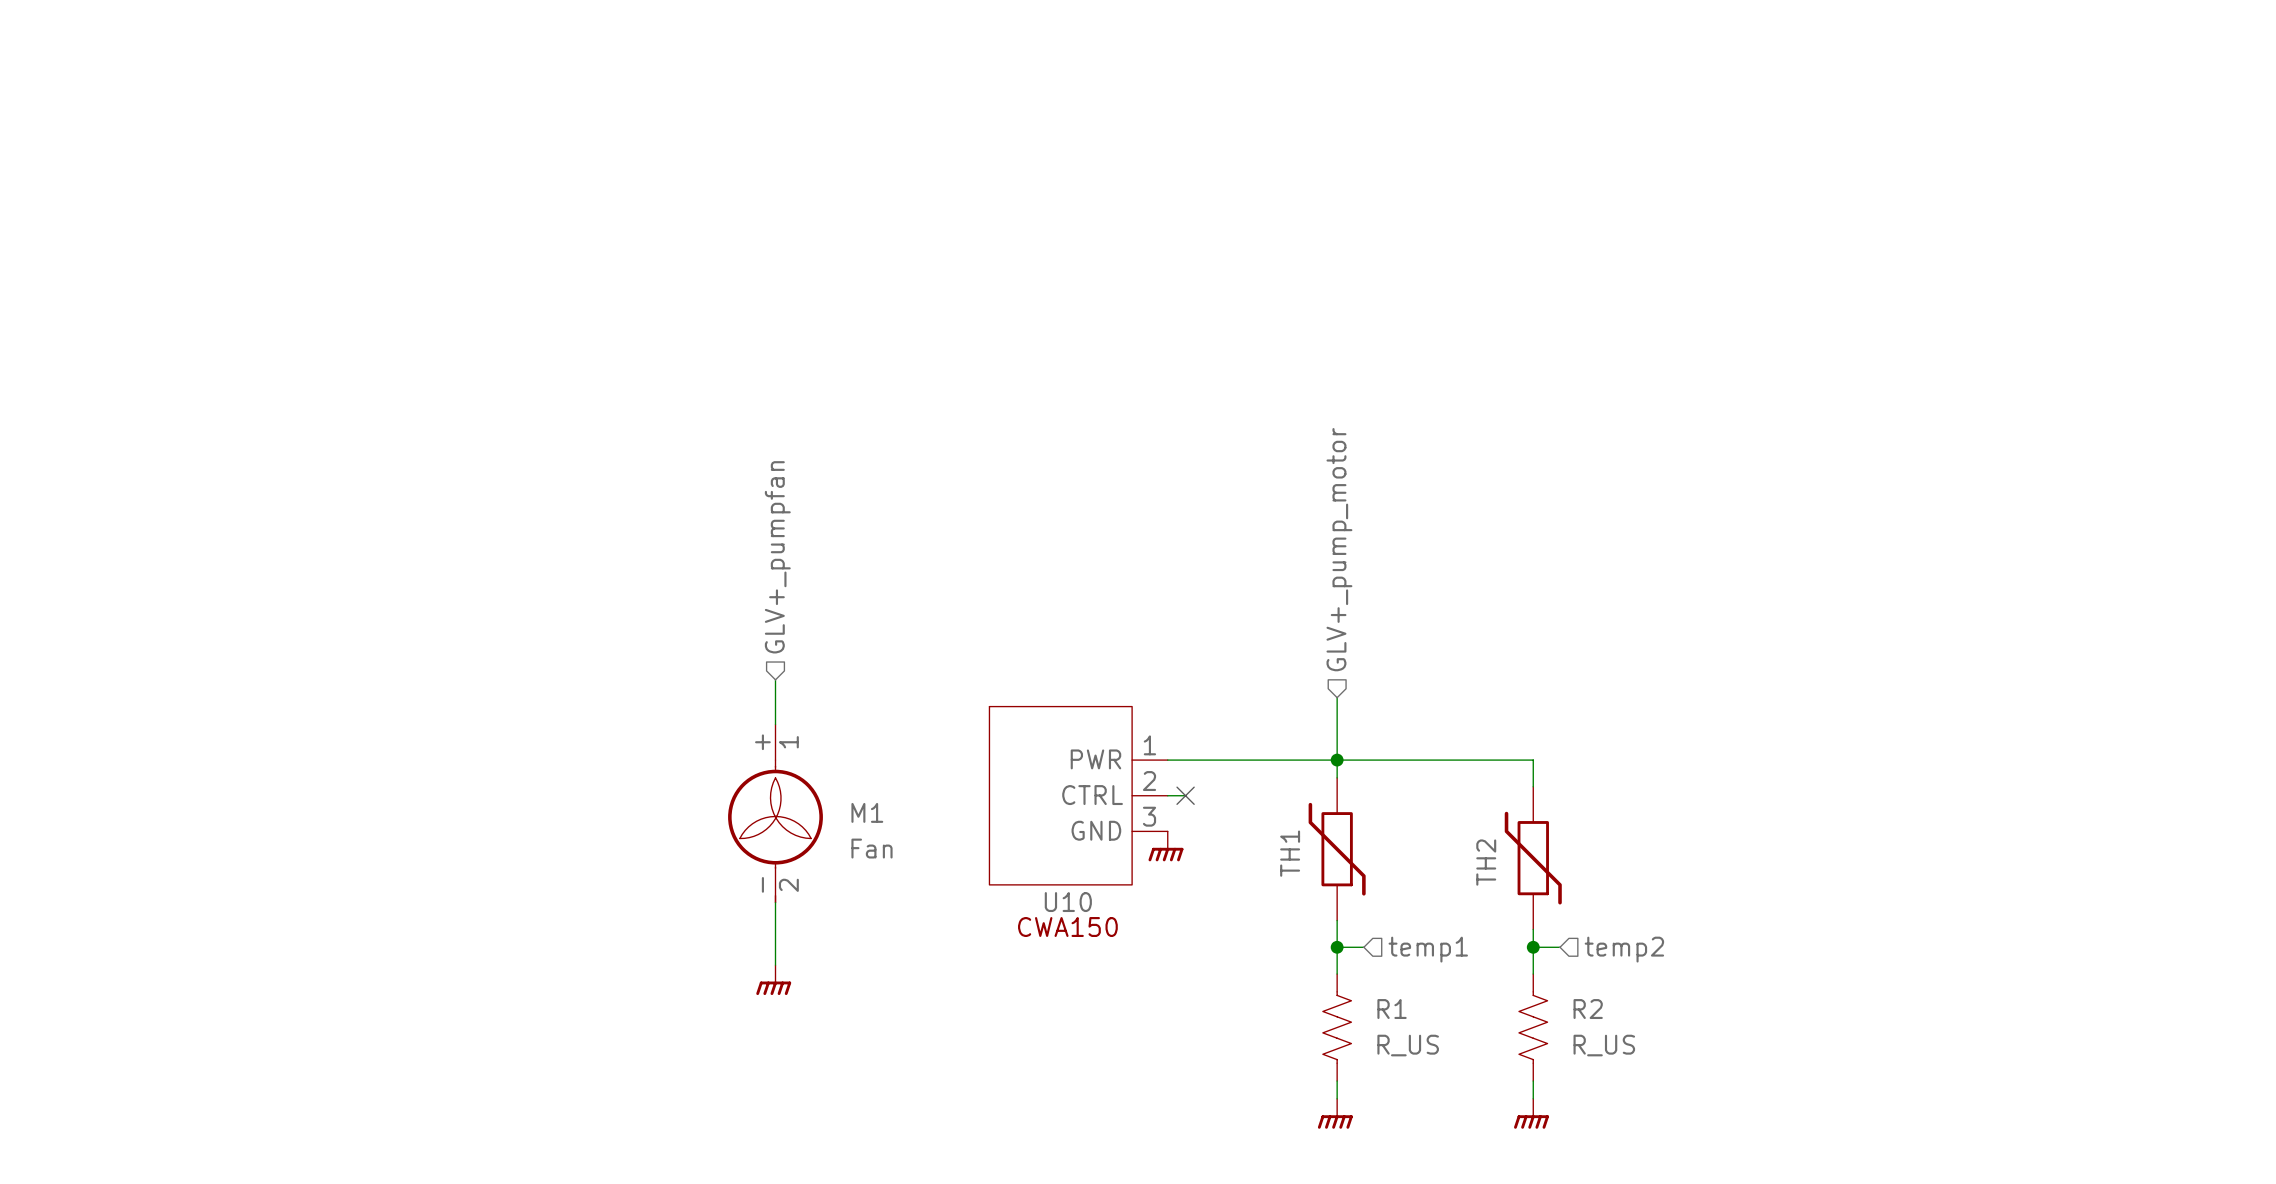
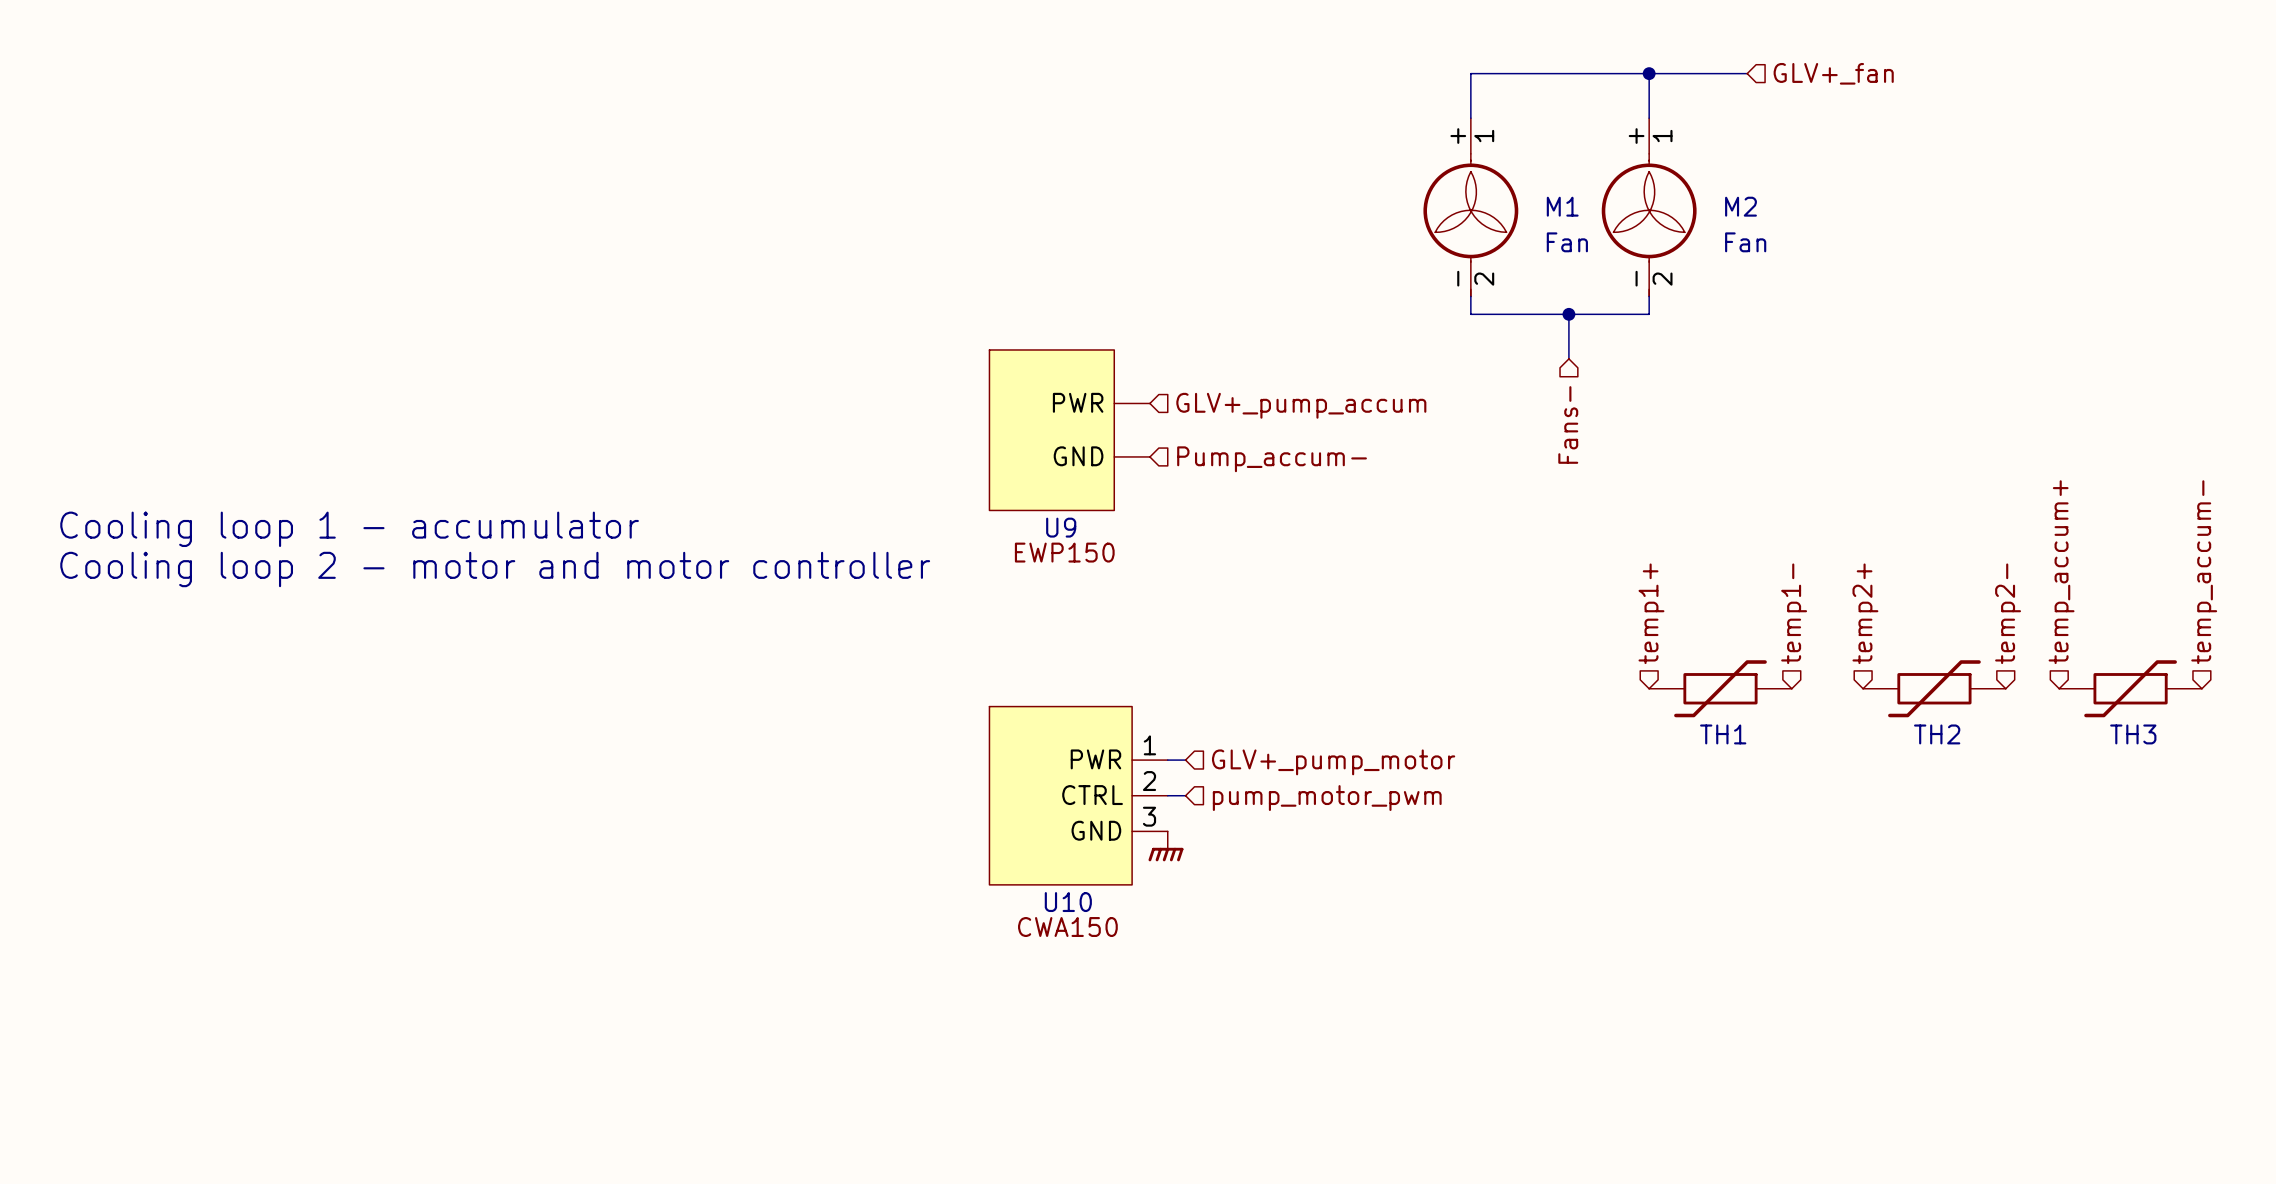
wire: none -> (1649, 73) (1649, 118)
junction: none -> (1649, 73)
wire: none -> (1747, 73) (1470, 73) (1470, 118)
hierarchical label: none -> GLV+_fan (1833, 73)
M2: none -> Fan (1649, 207)
wire: none -> (1470, 296) (1470, 314) (1649, 314) (1649, 296)
wire: none -> (1568, 314) (1568, 358)
junction: none -> (1568, 314)
hierarchical label: none -> GLV+_pump_accum (1301, 405)
hierarchical label: none -> Fans- (1568, 424)
U9: none -> (1069, 430)
hierarchical label: none -> Pump_accum- (1272, 459)
text: none -> Cooling loop 1 - accumulator (349, 529)
hierarchical label rotation: 0° (1339, 549) -> 90° clockwise (1333, 762)
hierarchical label: GLV+_pumpfan (777, 557) -> none
text: none -> Cooling loop 2 - motor and motor controller (495, 569)
hierarchical label: none -> temp_accum+ (2061, 572)
hierarchical label: none -> temp_accum- (2204, 572)
hierarchical label: none -> temp1+ (1651, 613)
hierarchical label: none -> temp1- (1794, 613)
hierarchical label: none -> temp2+ (1865, 613)
hierarchical label: none -> temp2- (2008, 613)
wire: (775, 679) (775, 724) -> none
TH3: none -> (2130, 688)
wire: (1337, 697) (1337, 777) -> none
wire: (1185, 760) (1533, 760) (1533, 786) -> none
junction: (1337, 760) -> none
no-connect mark: (1185, 795) -> none
hierarchical label: none -> pump_motor_pwm (1327, 798)
M1 position: (775, 813) -> (1470, 207)
TH1 rotation: 0° (1337, 849) -> 90° counterclockwise (1720, 688)
TH1 position: (1337, 849) -> (1720, 688)
TH2 rotation: 0° (1533, 858) -> 90° counterclockwise (1934, 688)
TH2 position: (1533, 858) -> (1934, 688)
wire: (775, 902) (775, 965) -> none
wire: (1337, 920) (1337, 974) -> none
wire: (1533, 929) (1533, 974) -> none
wire: (1337, 947) (1363, 947) -> none
junction: (1337, 947) -> none
wire: (1533, 947) (1560, 947) -> none
junction: (1533, 947) -> none
hierarchical label: temp1 (1428, 949) -> none
hierarchical label: temp2 (1624, 949) -> none
power symbol: (773, 980) -> none
R1: R_US (1337, 1027) -> none
R2: R_US (1533, 1027) -> none
wire: (1337, 1081) (1337, 1098) -> none
wire: (1533, 1081) (1533, 1098) -> none
power symbol: (1335, 1113) -> none
power symbol: (1531, 1113) -> none

